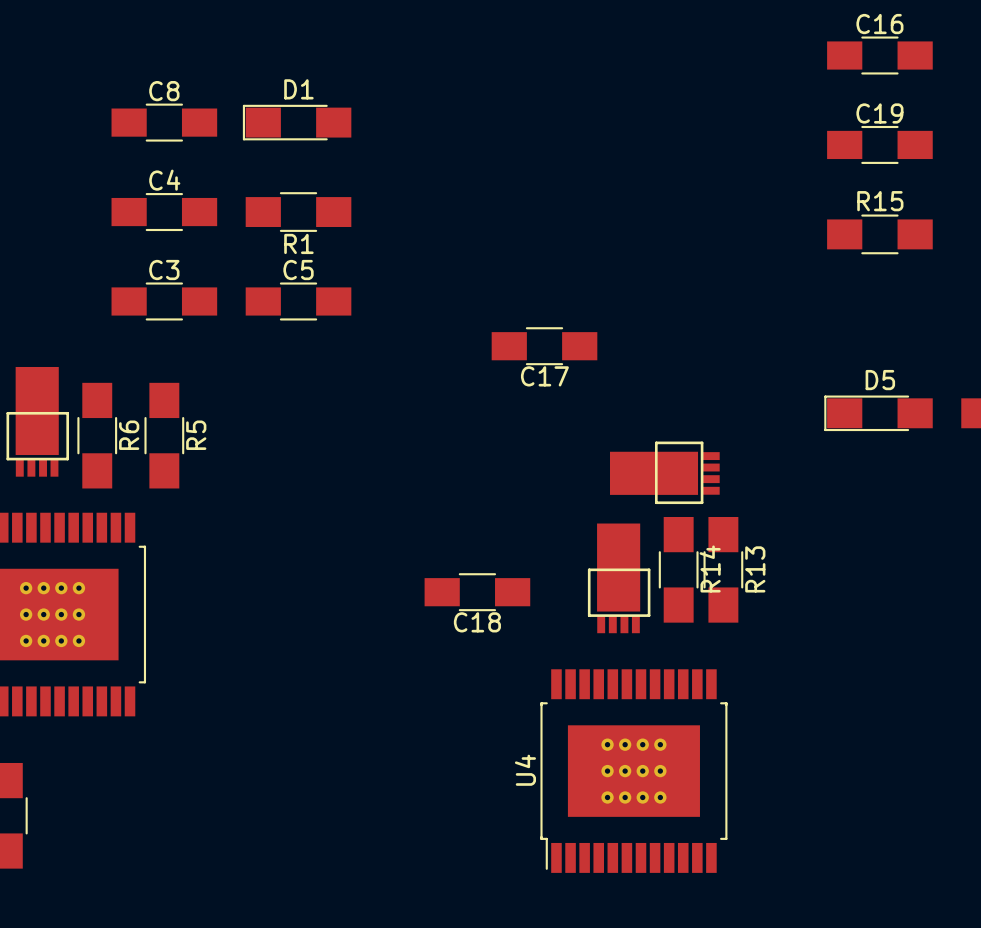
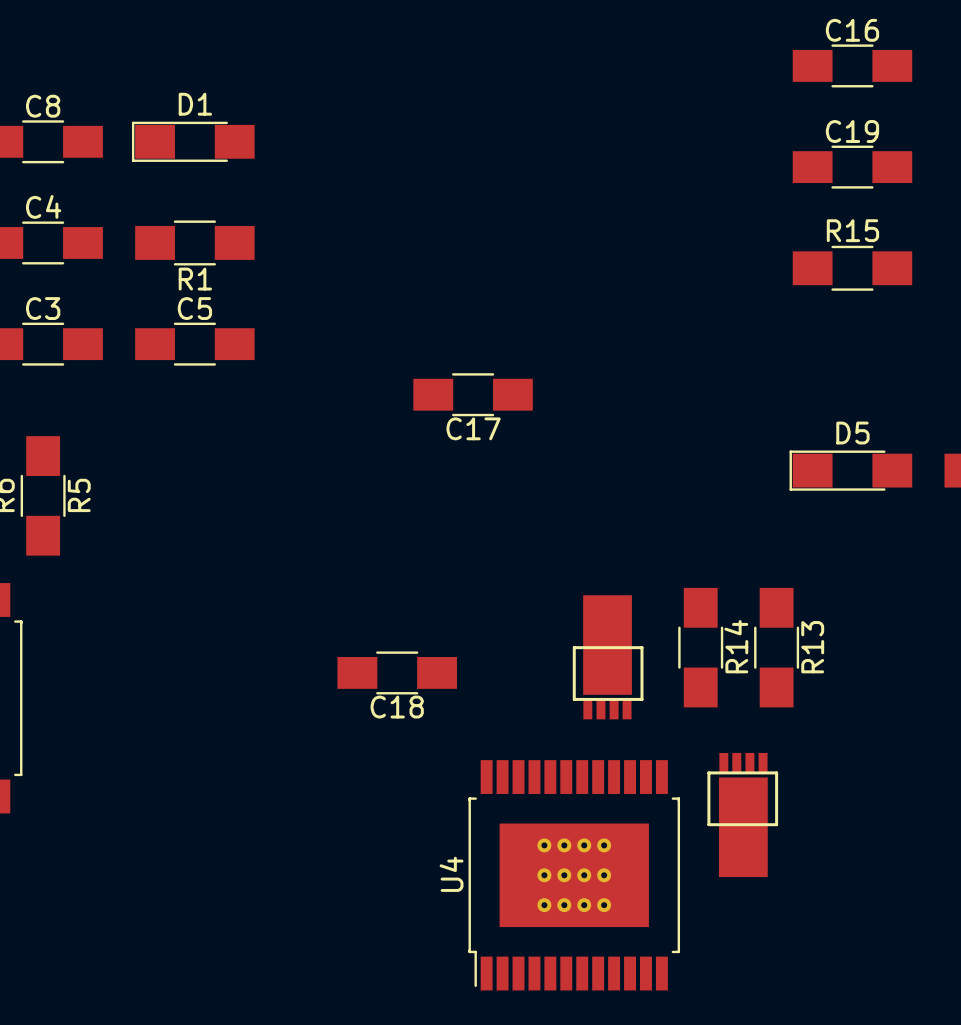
part: (664, 472) -> none
R14 position: (678, 569) -> (700, 647)
R13 position: (723, 569) -> (776, 647)
part position: (619, 578) -> (608, 657)
part: none -> (742, 815)

